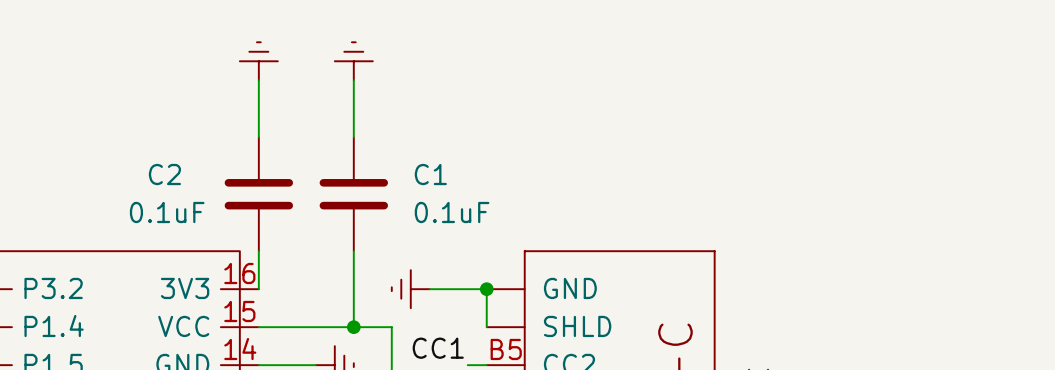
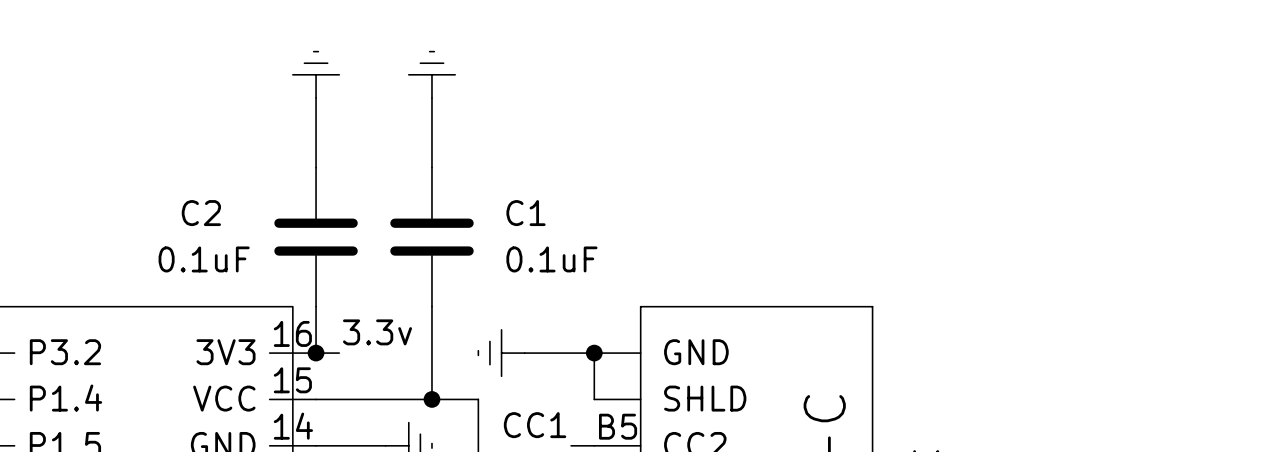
label: none -> 3.3v (377, 332)
wire: none -> (316, 353) (339, 353)
junction: none -> (316, 353)

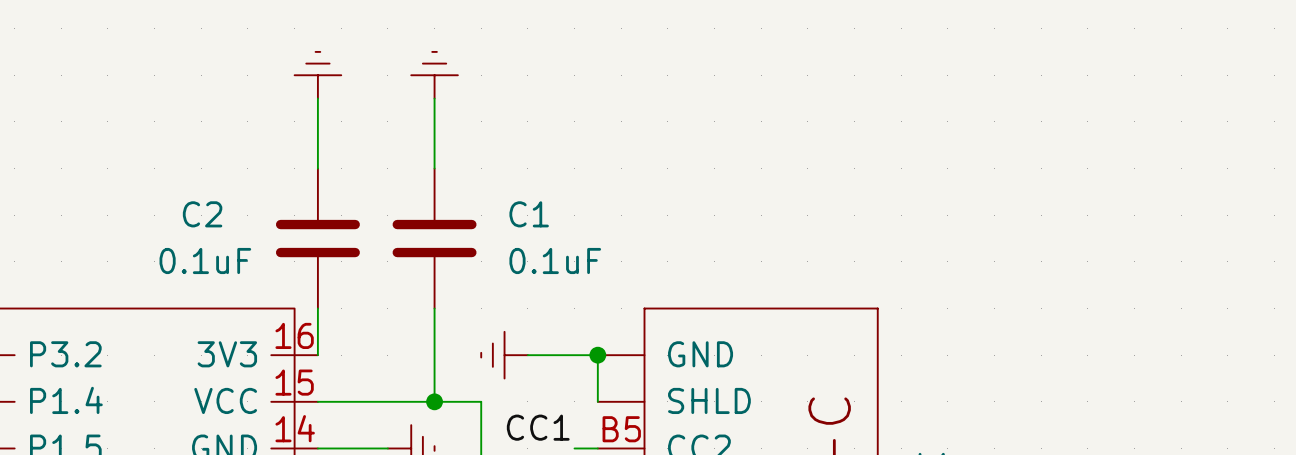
label: 3.3v (377, 332) -> none
wire: (316, 353) (339, 353) -> none
junction: (316, 353) -> none

